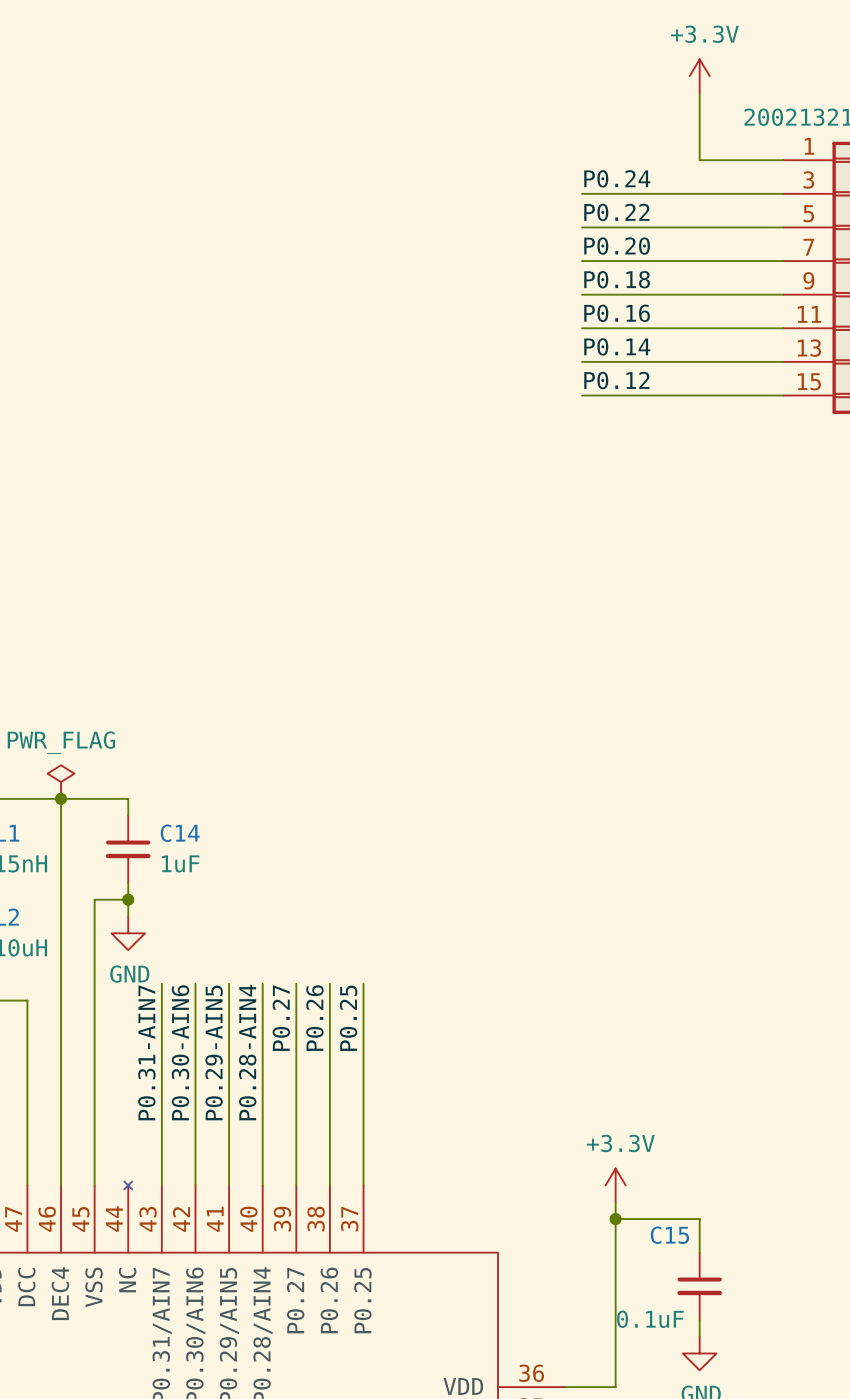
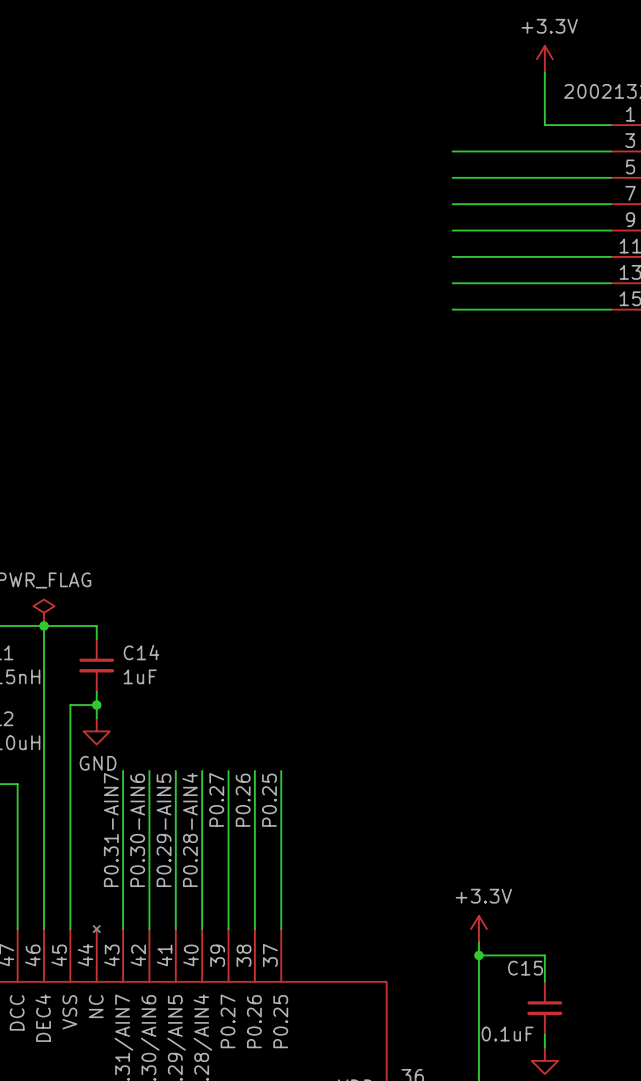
label: P0.24 (617, 178) -> none
label: P0.22 (616, 212) -> none
label: P0.20 (617, 246) -> none
label: P0.18 (617, 279) -> none
label: P0.16 (617, 313) -> none
label: P0.14 (617, 346) -> none
label: P0.12 (616, 380) -> none

